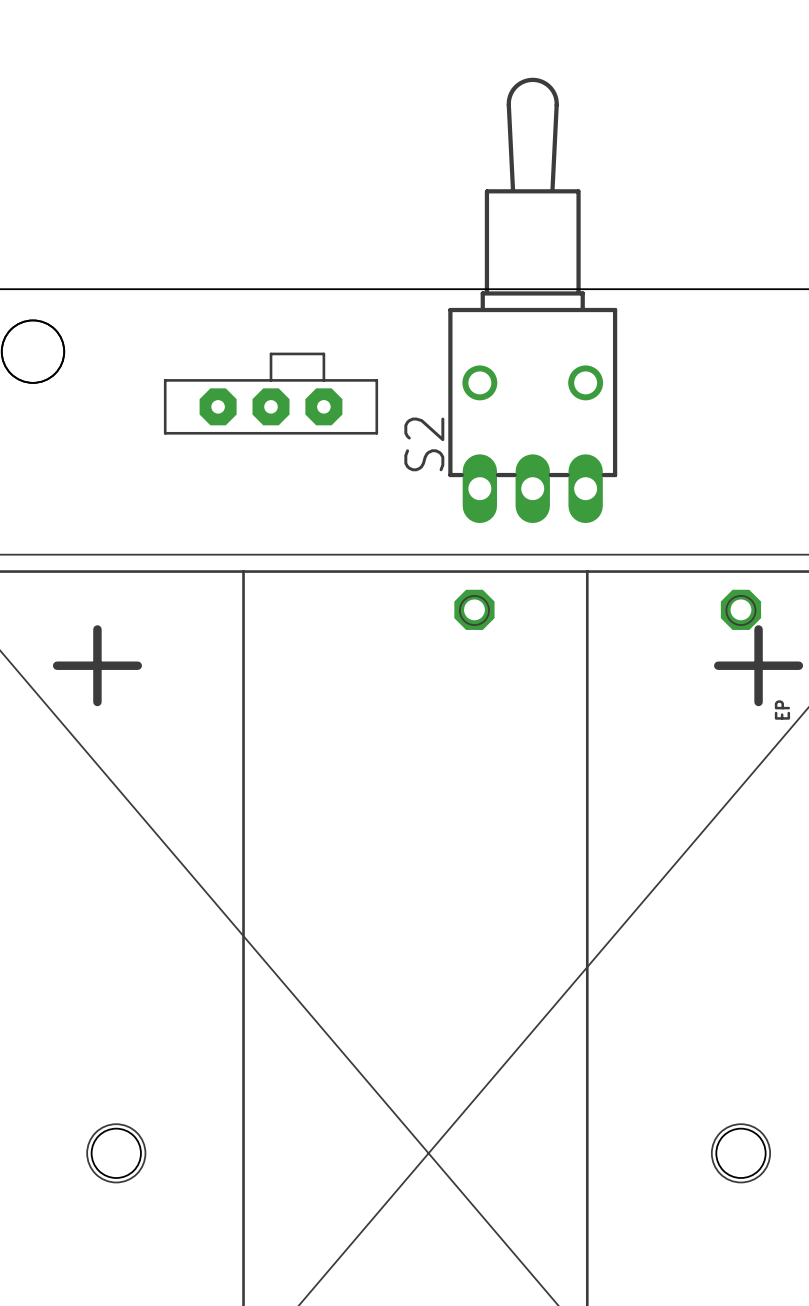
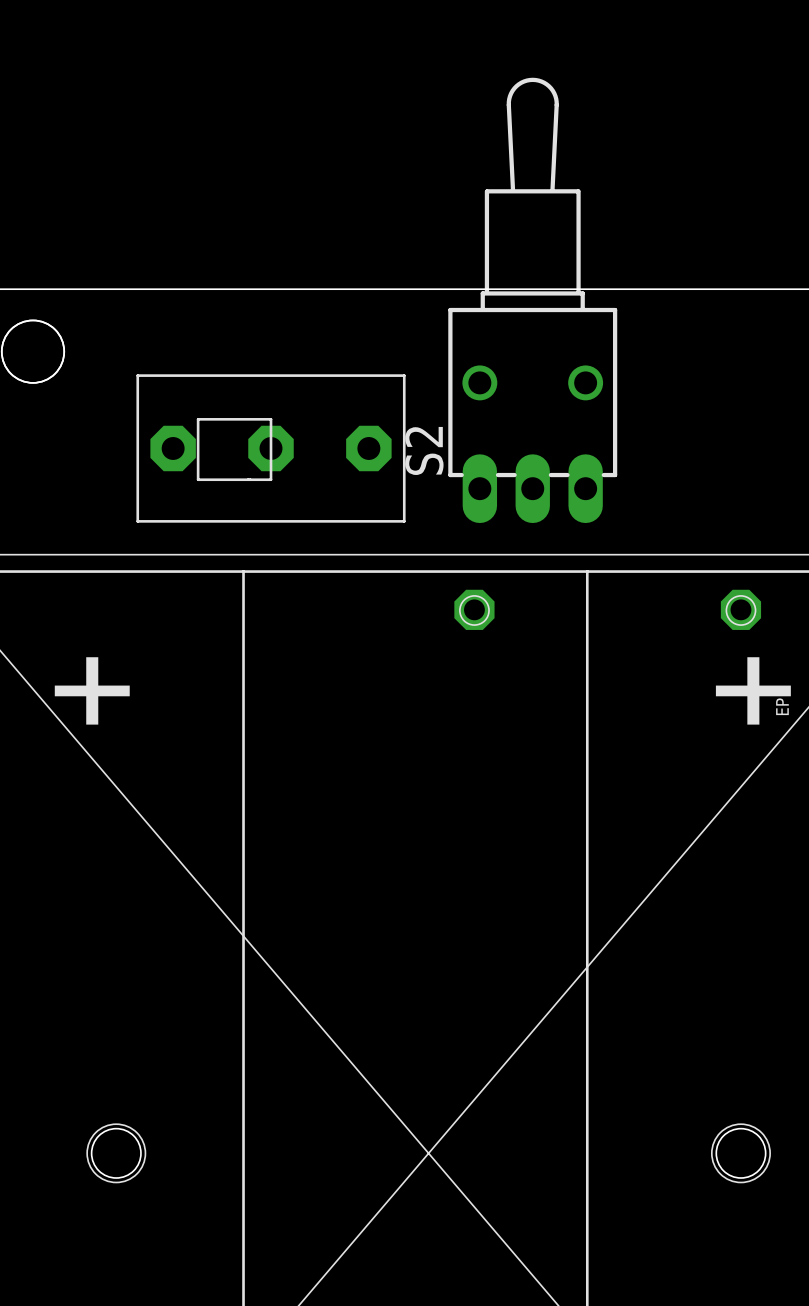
part: (271, 393) -> none
part: none -> (271, 448)

